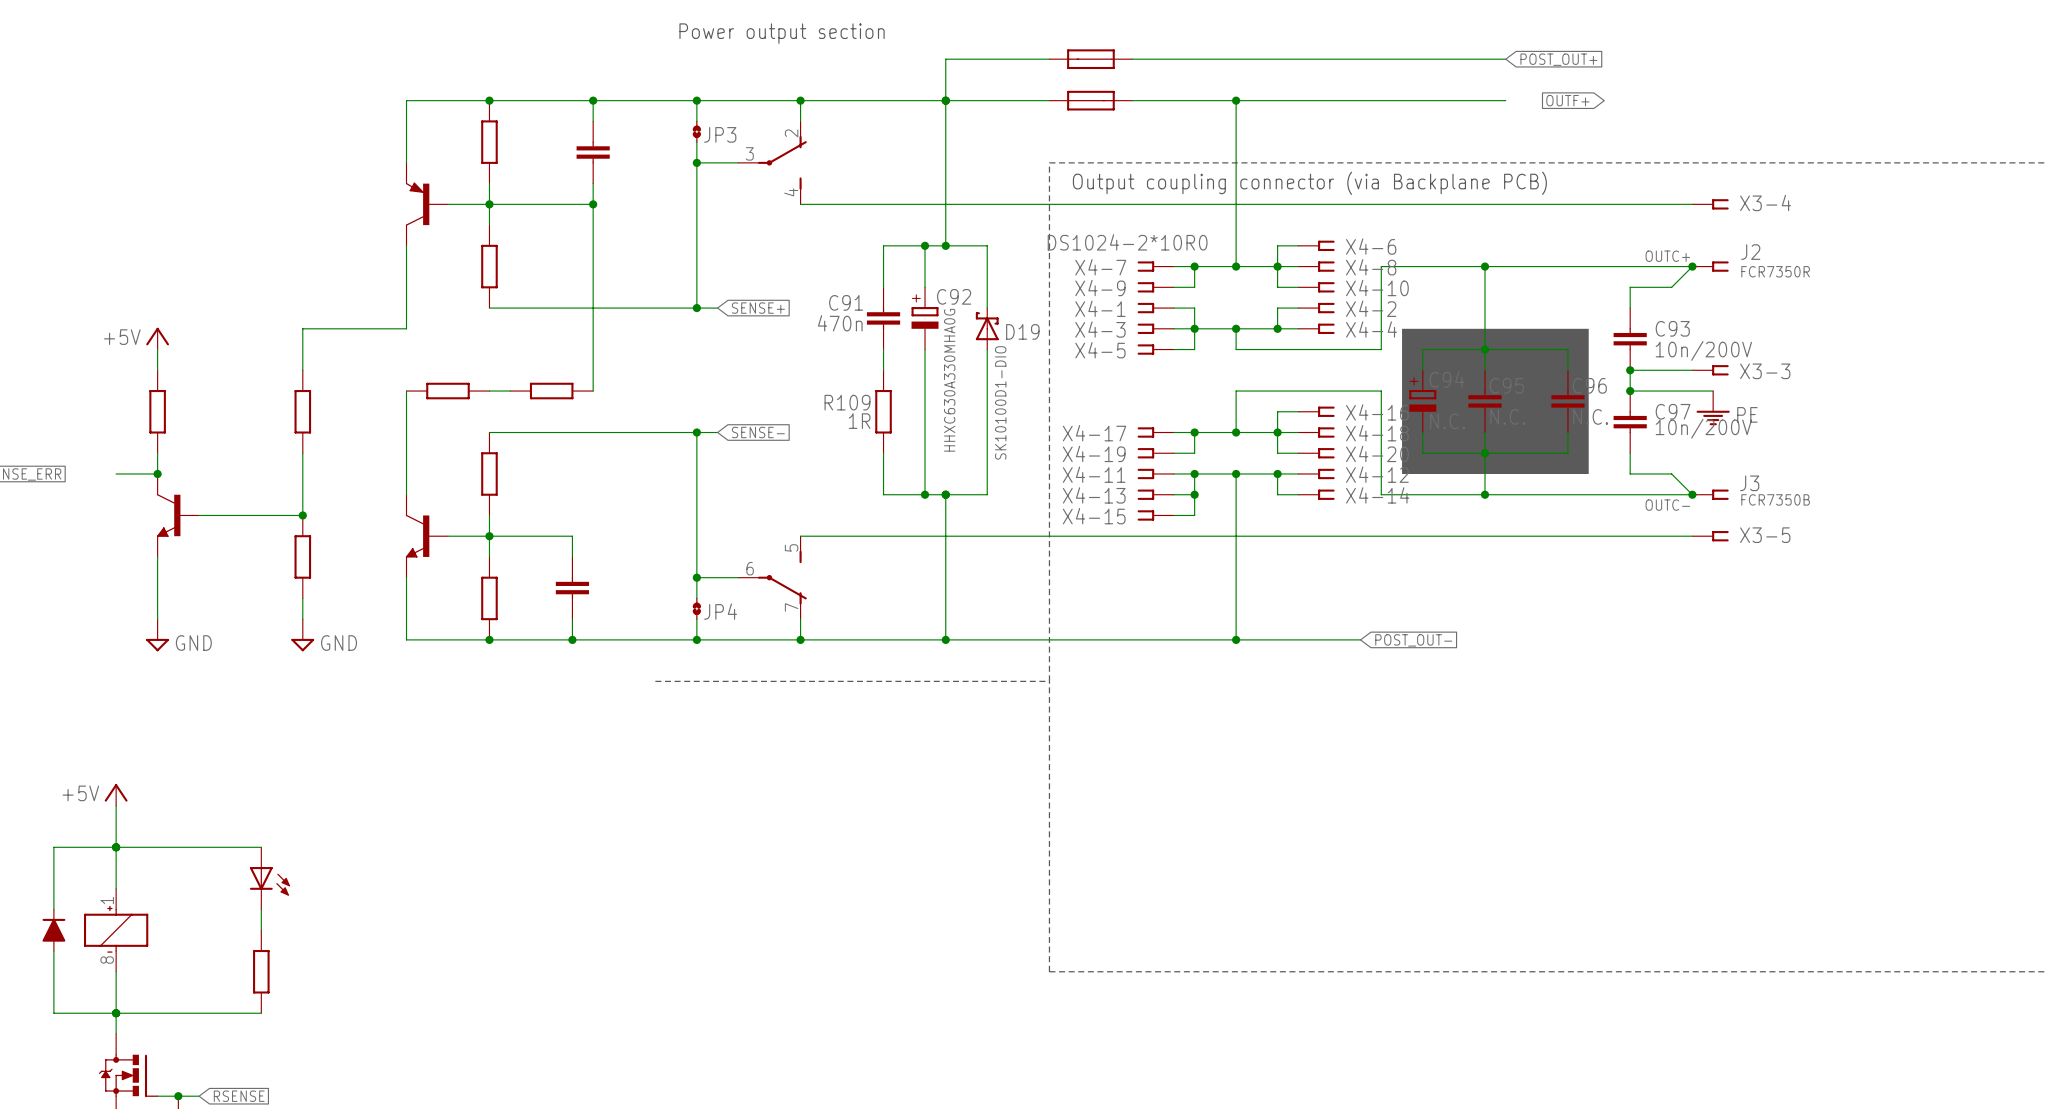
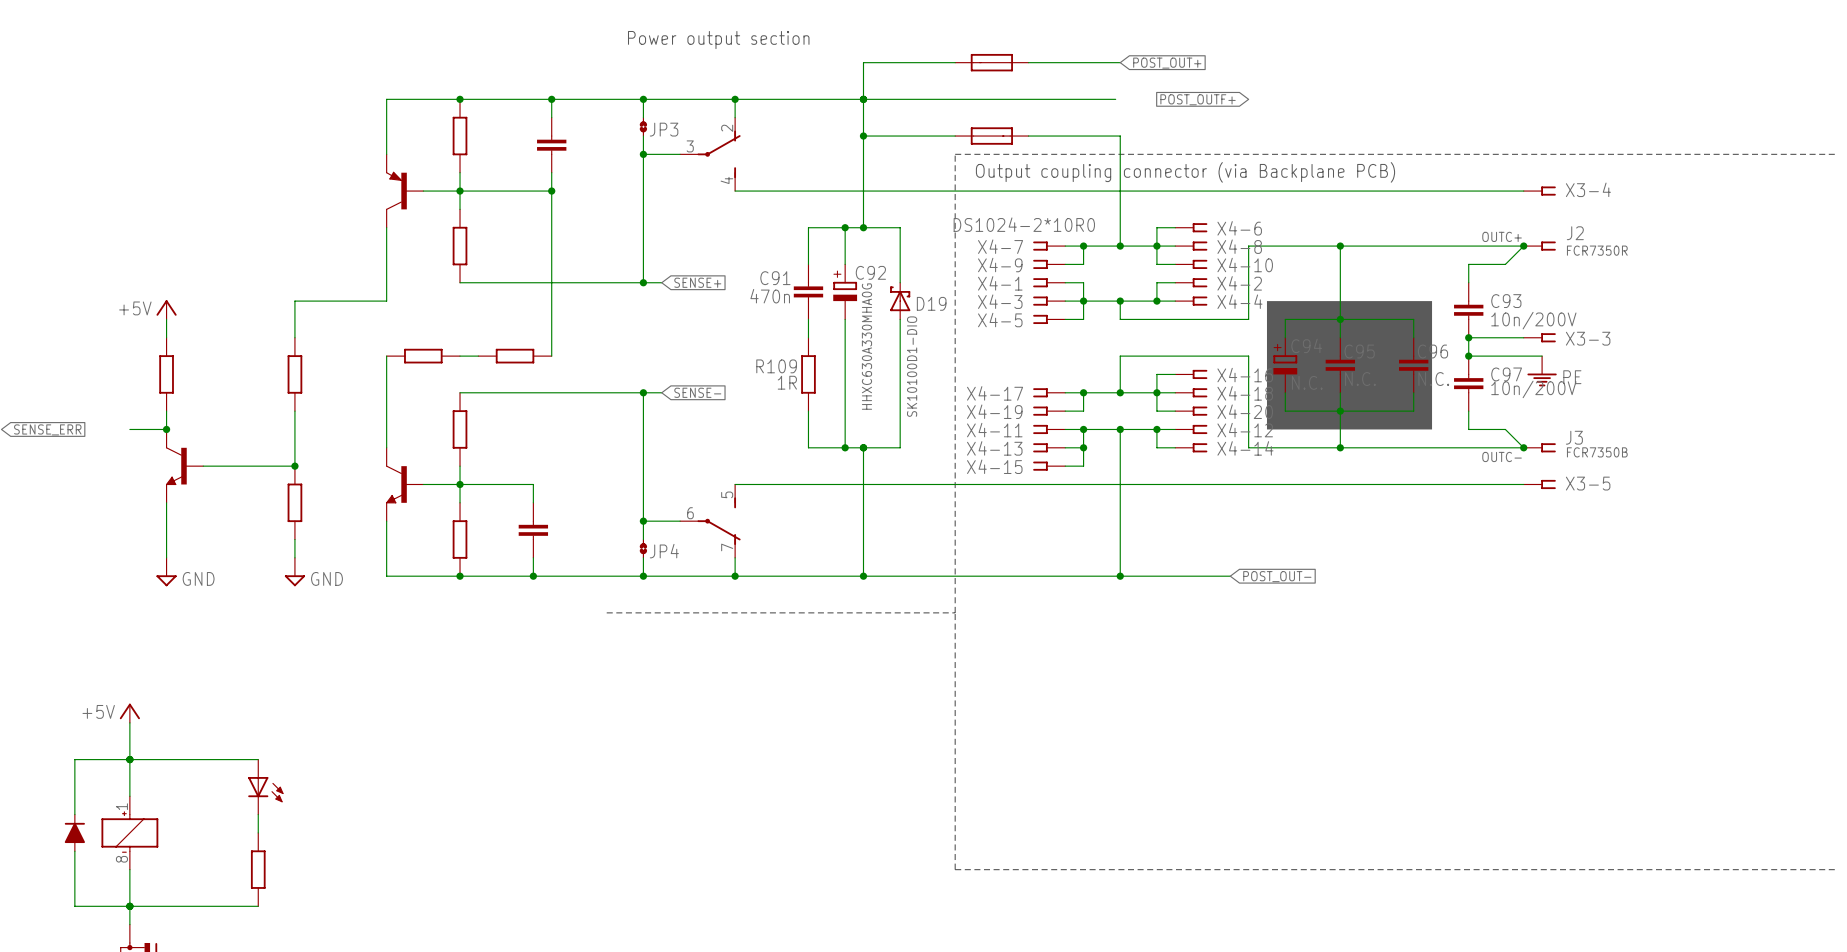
wire: (1236, 59) (1505, 59) -> none
global label: none -> POST_OUT+ (1167, 63)
global label: POST_OUT+ (1558, 59) -> none
part position: (1090, 100) -> (991, 136)
wire: (1230, 100) (1505, 100) -> none
wire: (1236, 100) (1236, 142) -> (1028, 136) (1120, 136)
junction: (1236, 100) -> none
global label: OUTF+ (1567, 100) -> none
global label: none -> POST_OUTF+ (1198, 99)
wire: none -> (863, 136) (955, 136)
junction: none -> (863, 136)

